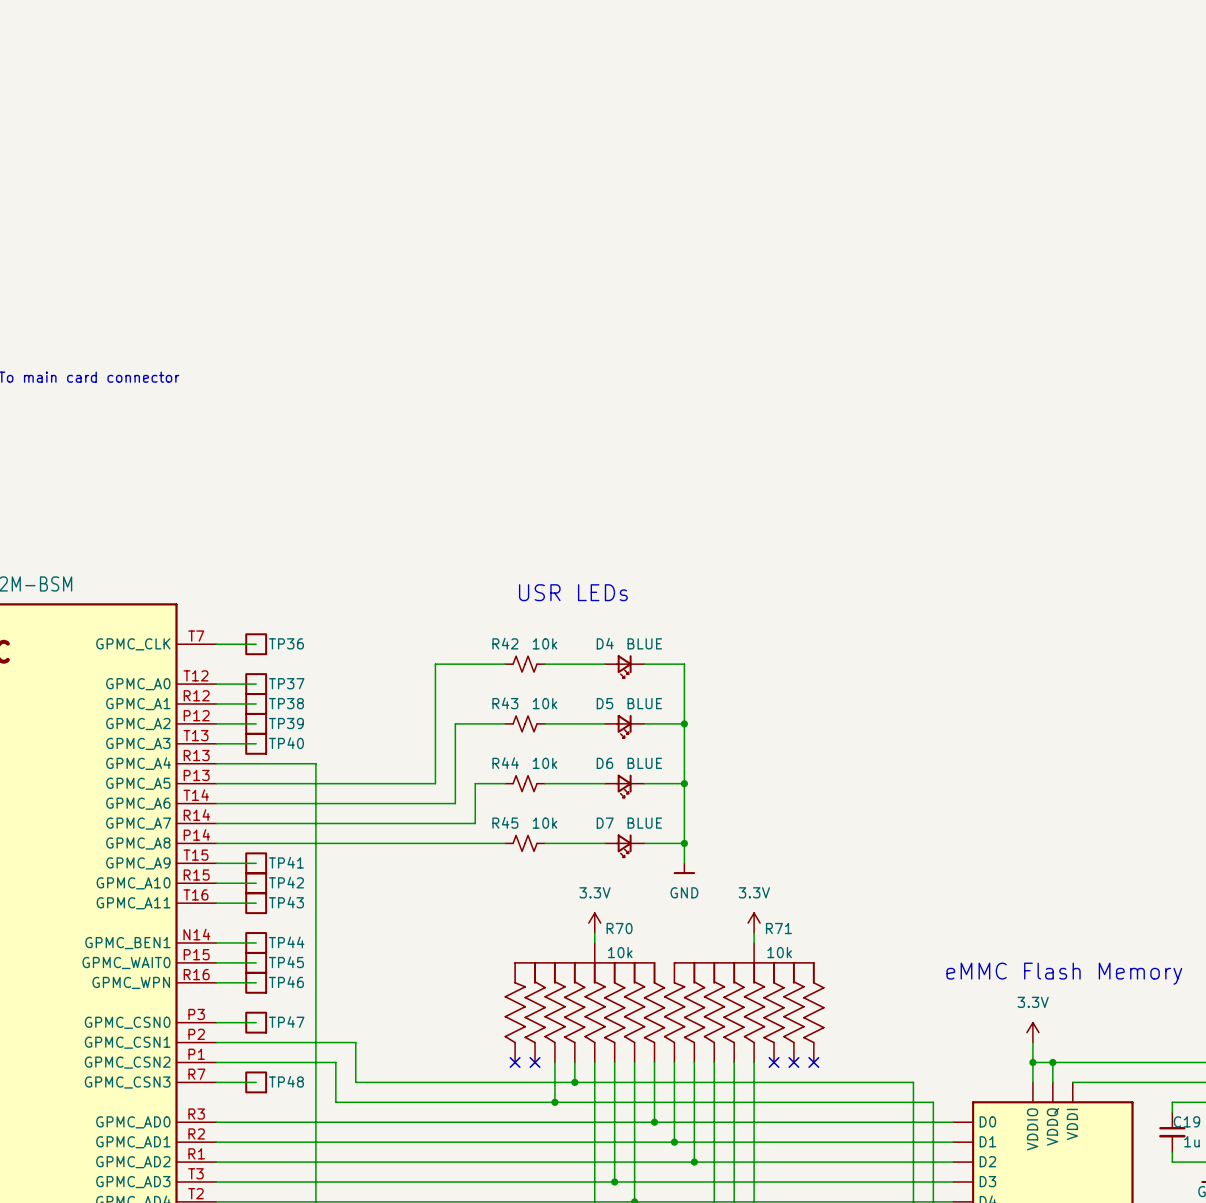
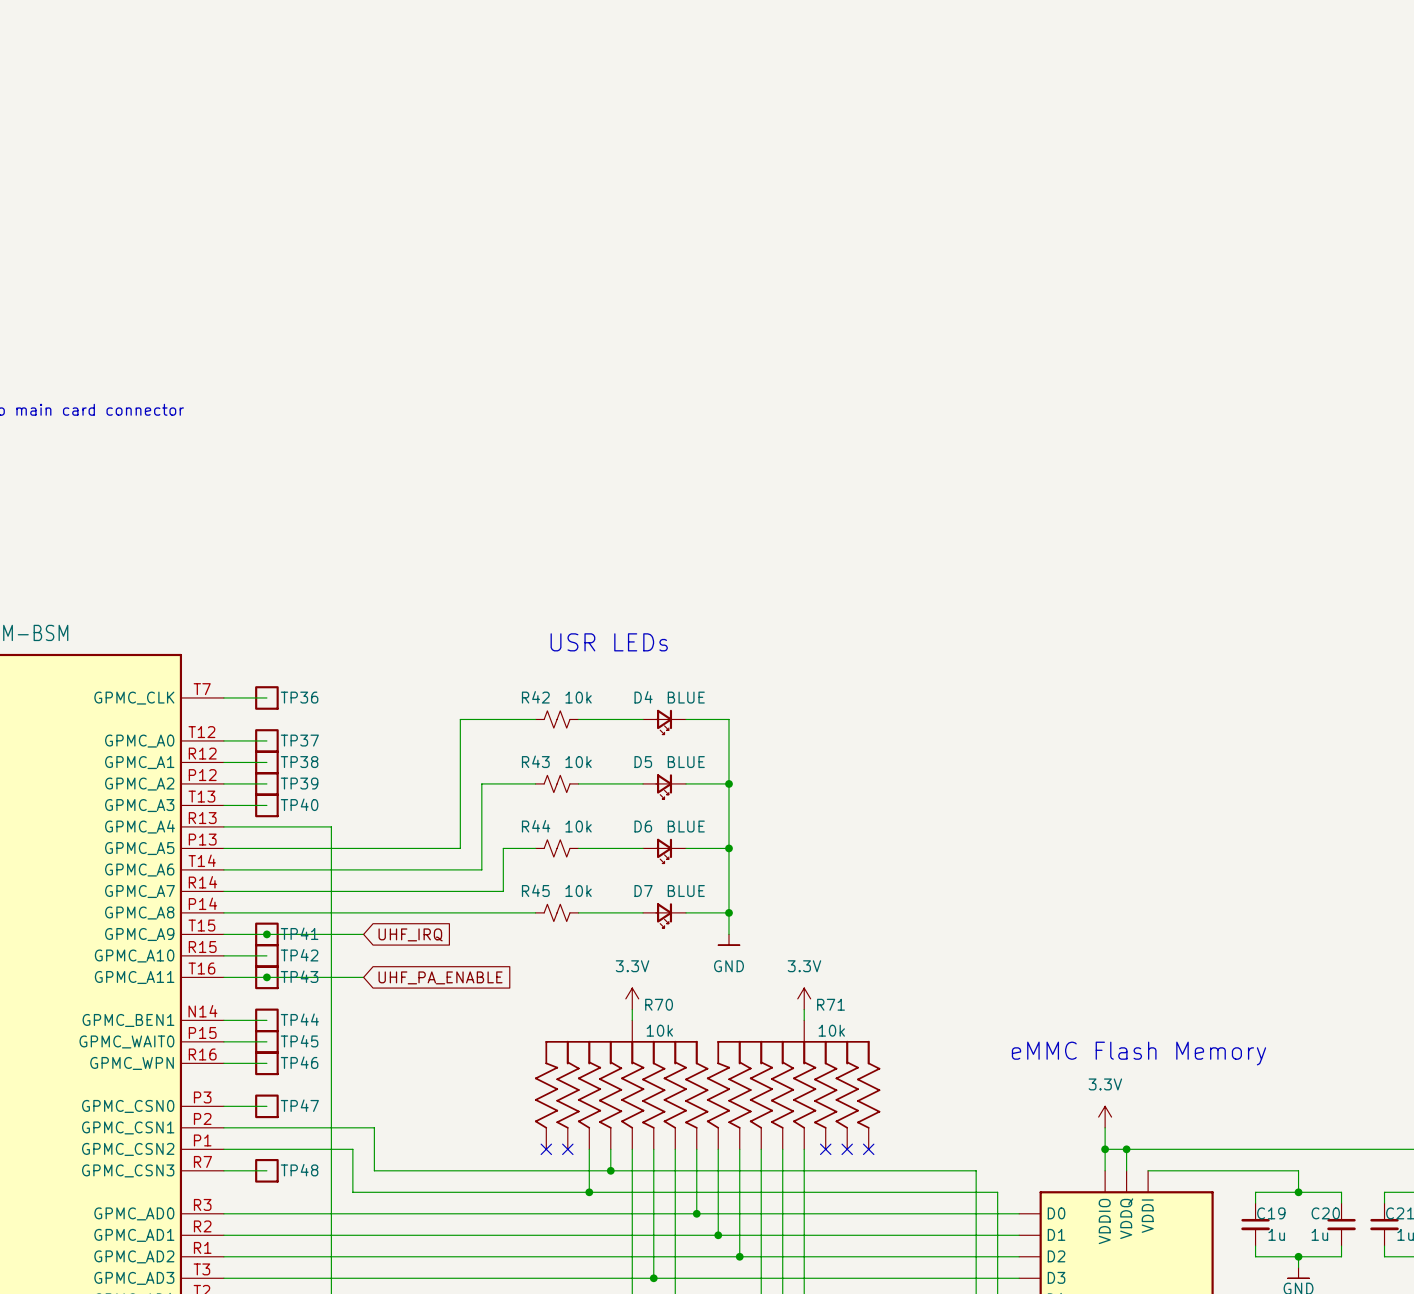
wire: none -> (266, 934) (363, 934)
junction: none -> (266, 934)
global label: none -> UHF_IRQ (410, 934)
wire: none -> (266, 977) (363, 977)
junction: none -> (266, 977)
global label: none -> UHF_PA_ENABLE (440, 977)

